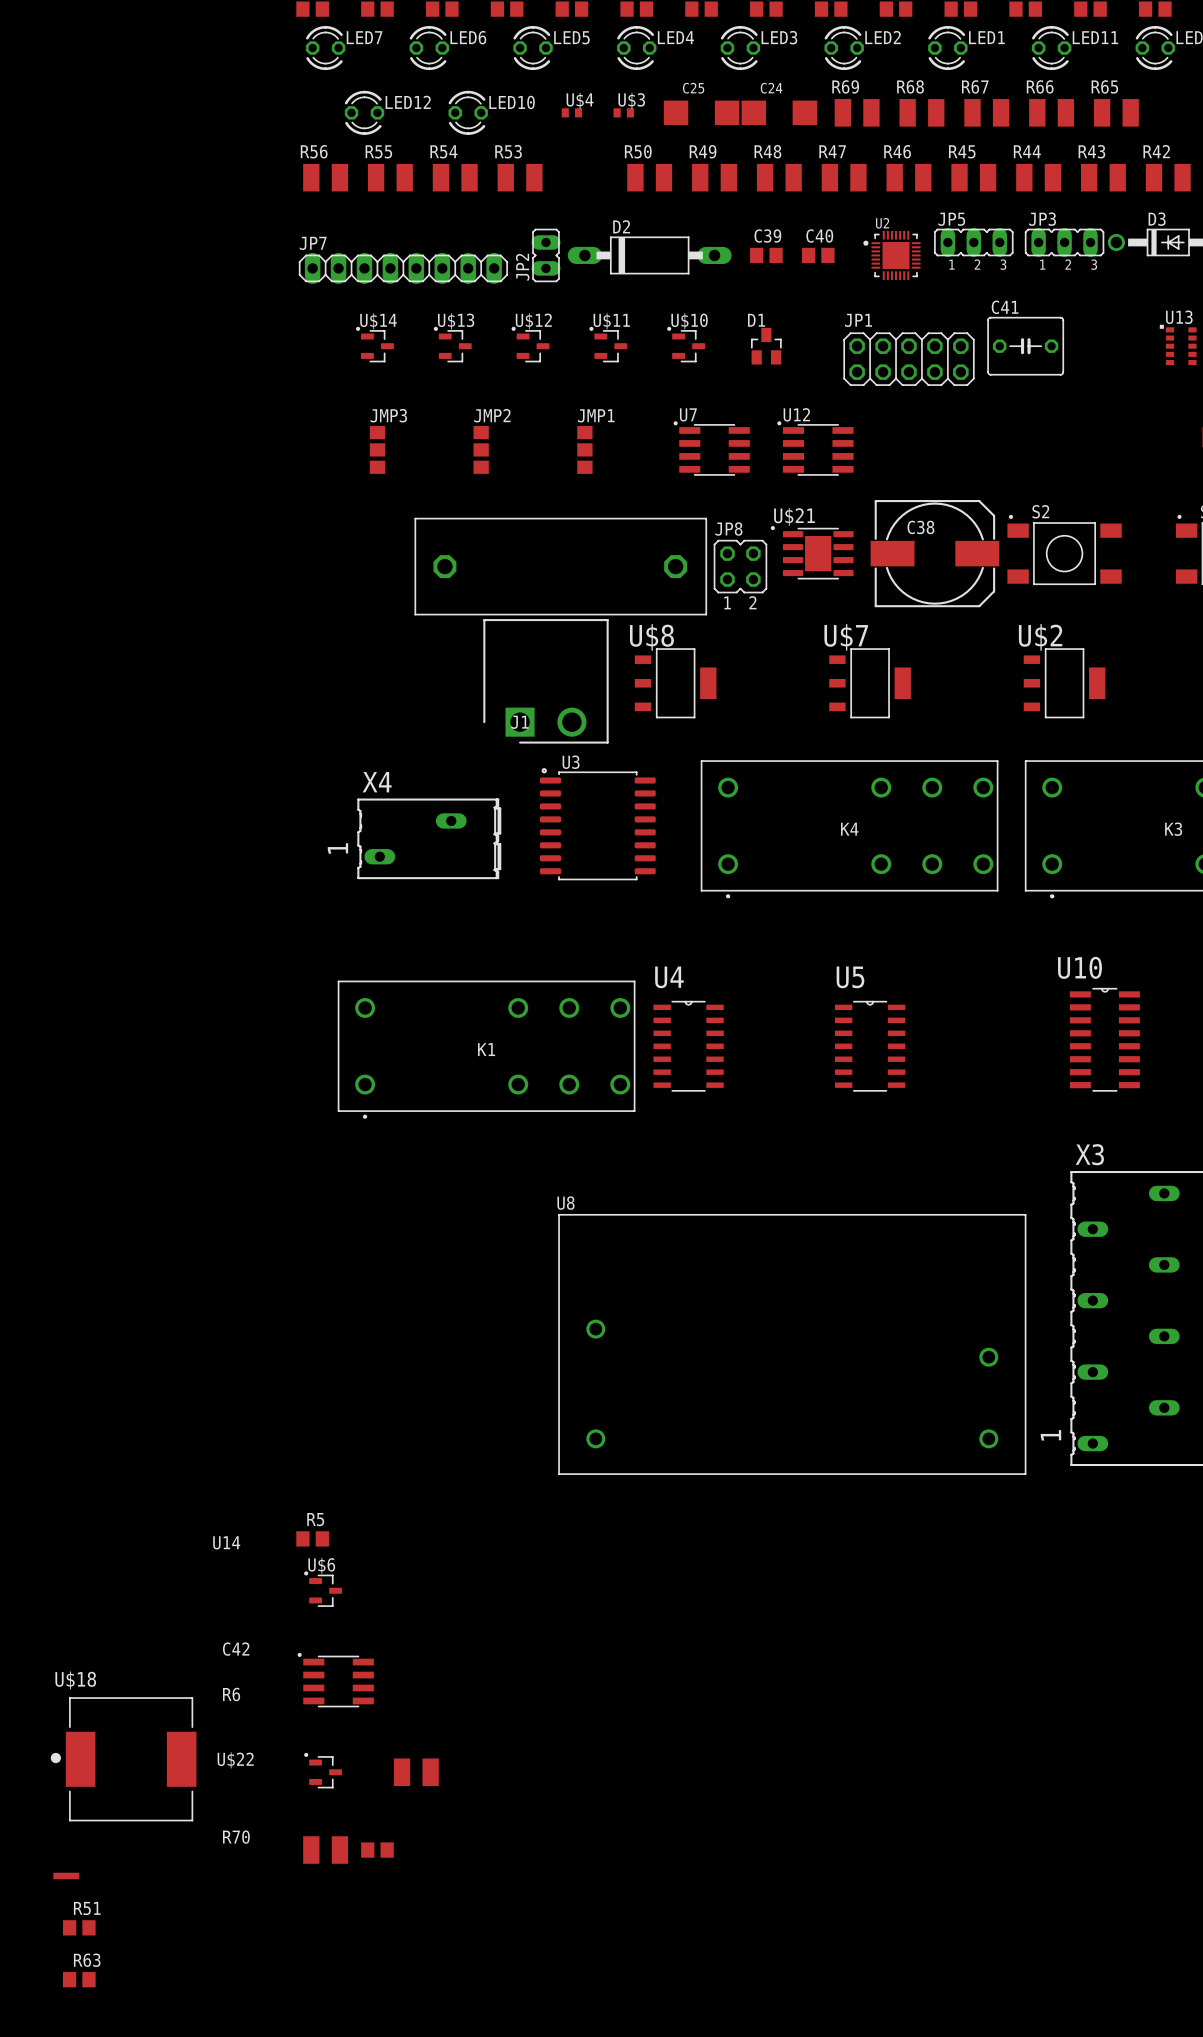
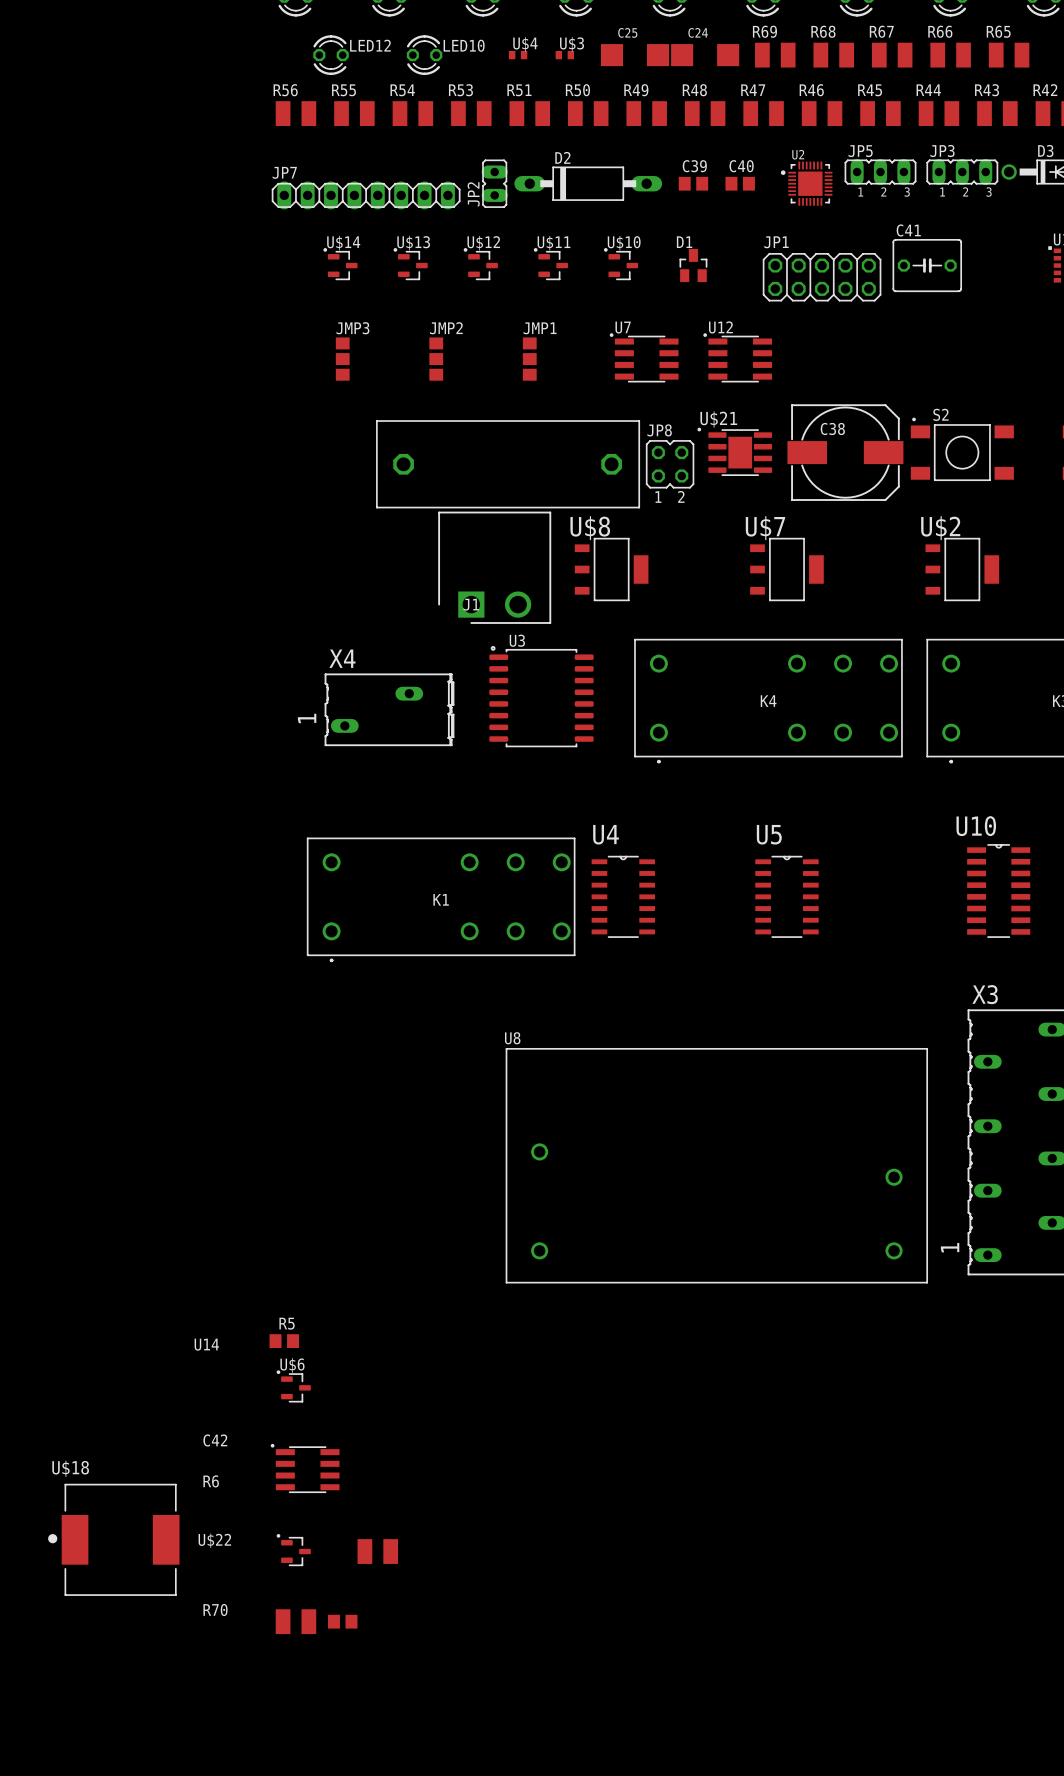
part: (66, 1875) -> none
R51 name position: R51 (87, 1908) -> R51 (519, 90)
R51 footprint: [62, 1920, 96, 1936] -> [509, 101, 551, 126]
R63: (79, 1979) -> none

